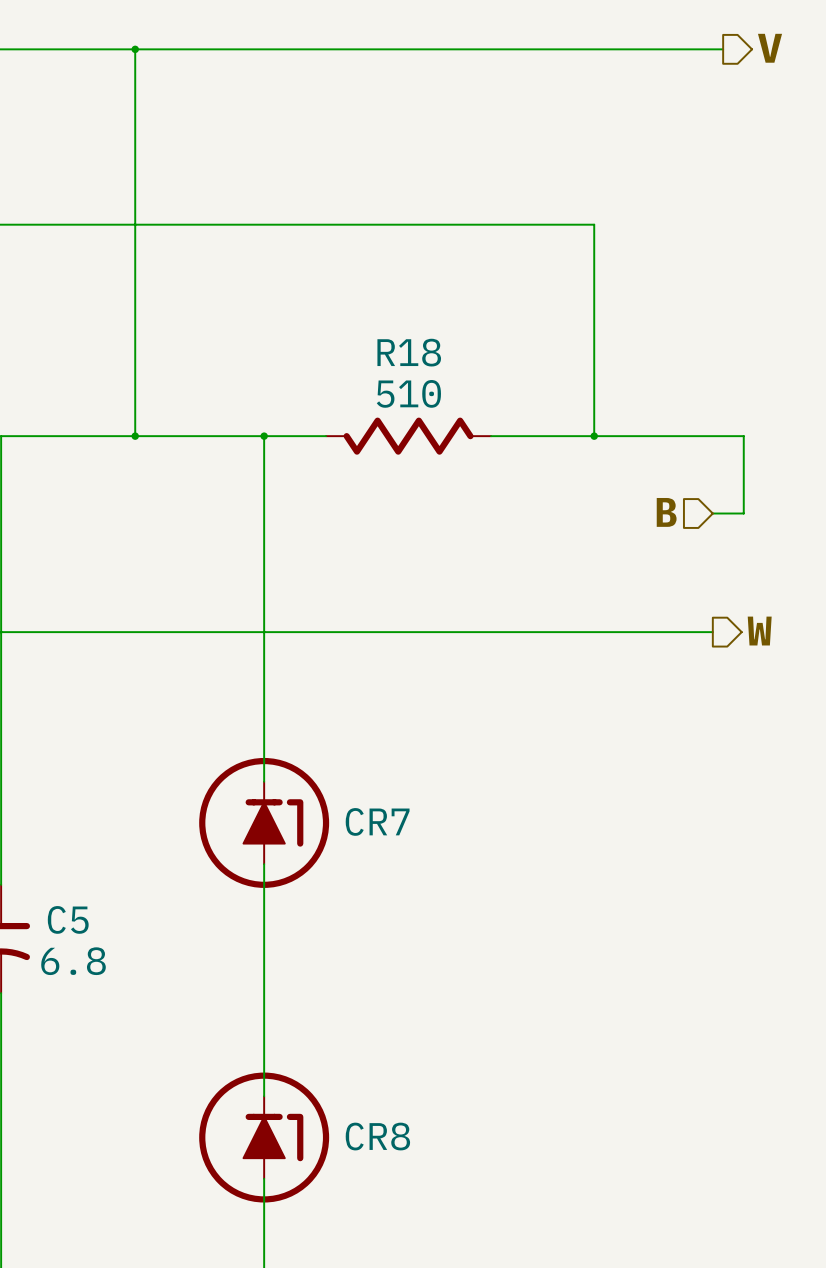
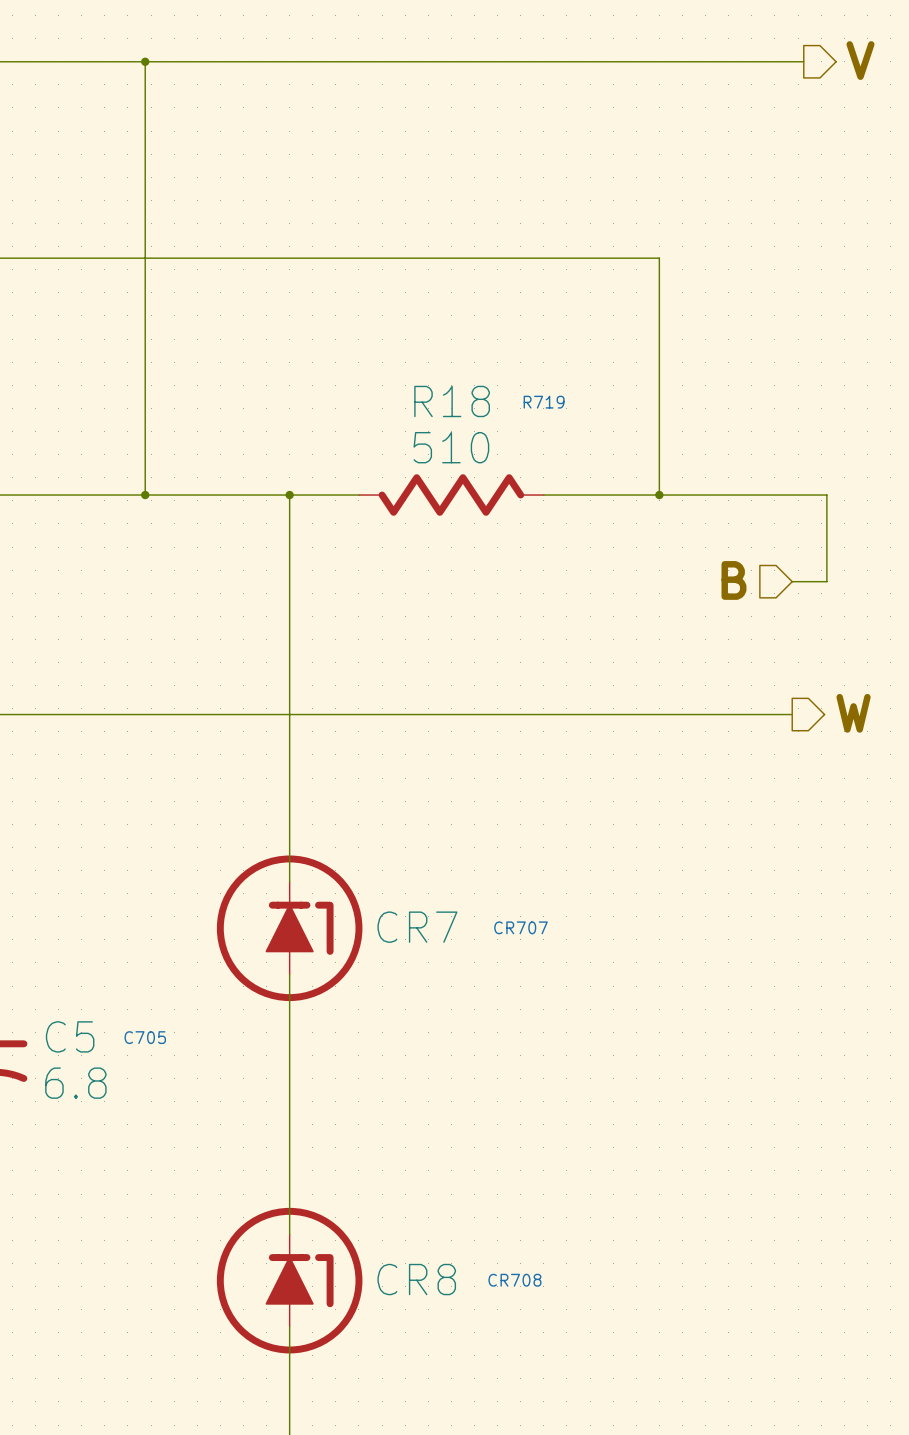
R719 name: none -> R719 (544, 402)
CR707 name: none -> CR707 (520, 927)
C705 name: none -> C705 (145, 1037)
CR708 name: none -> CR708 (514, 1280)

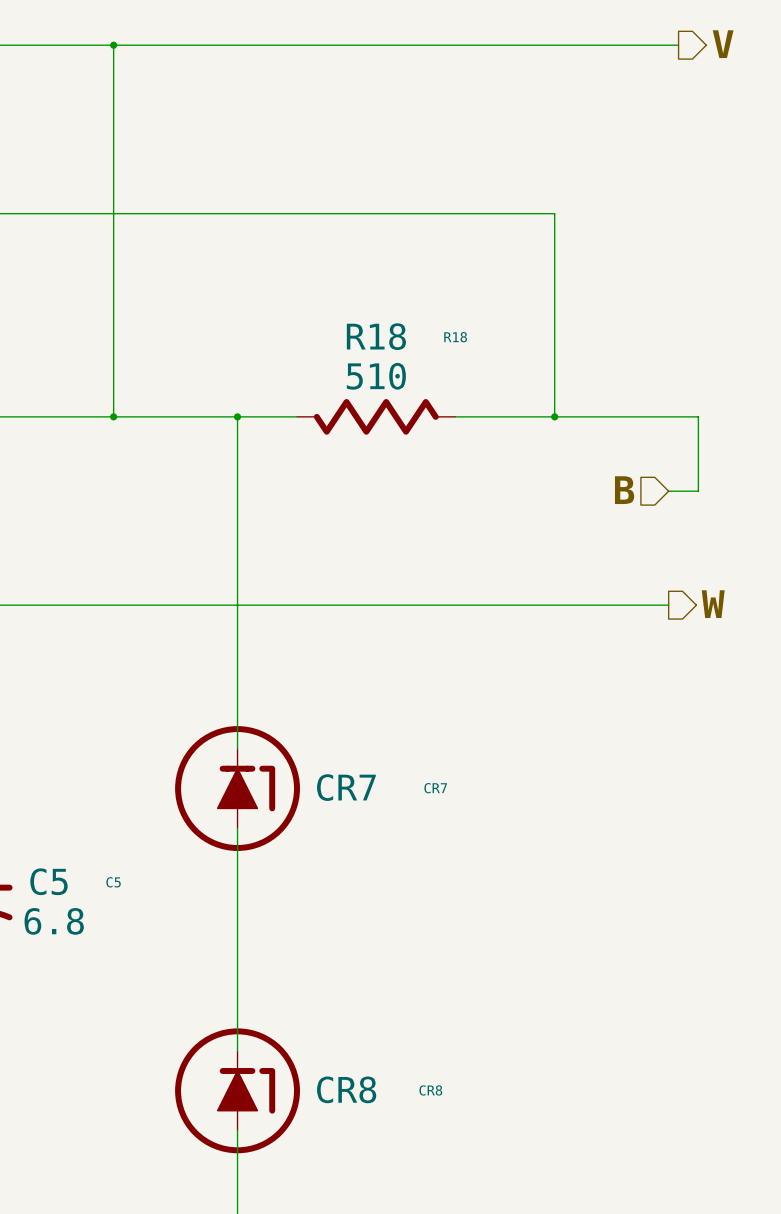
R719 name: R719 (544, 402) -> R18 (455, 337)
CR707 name: CR707 (520, 927) -> CR7 (435, 788)
C705 name: C705 (145, 1037) -> C5 (113, 882)
CR708 name: CR708 (514, 1280) -> CR8 (430, 1090)

